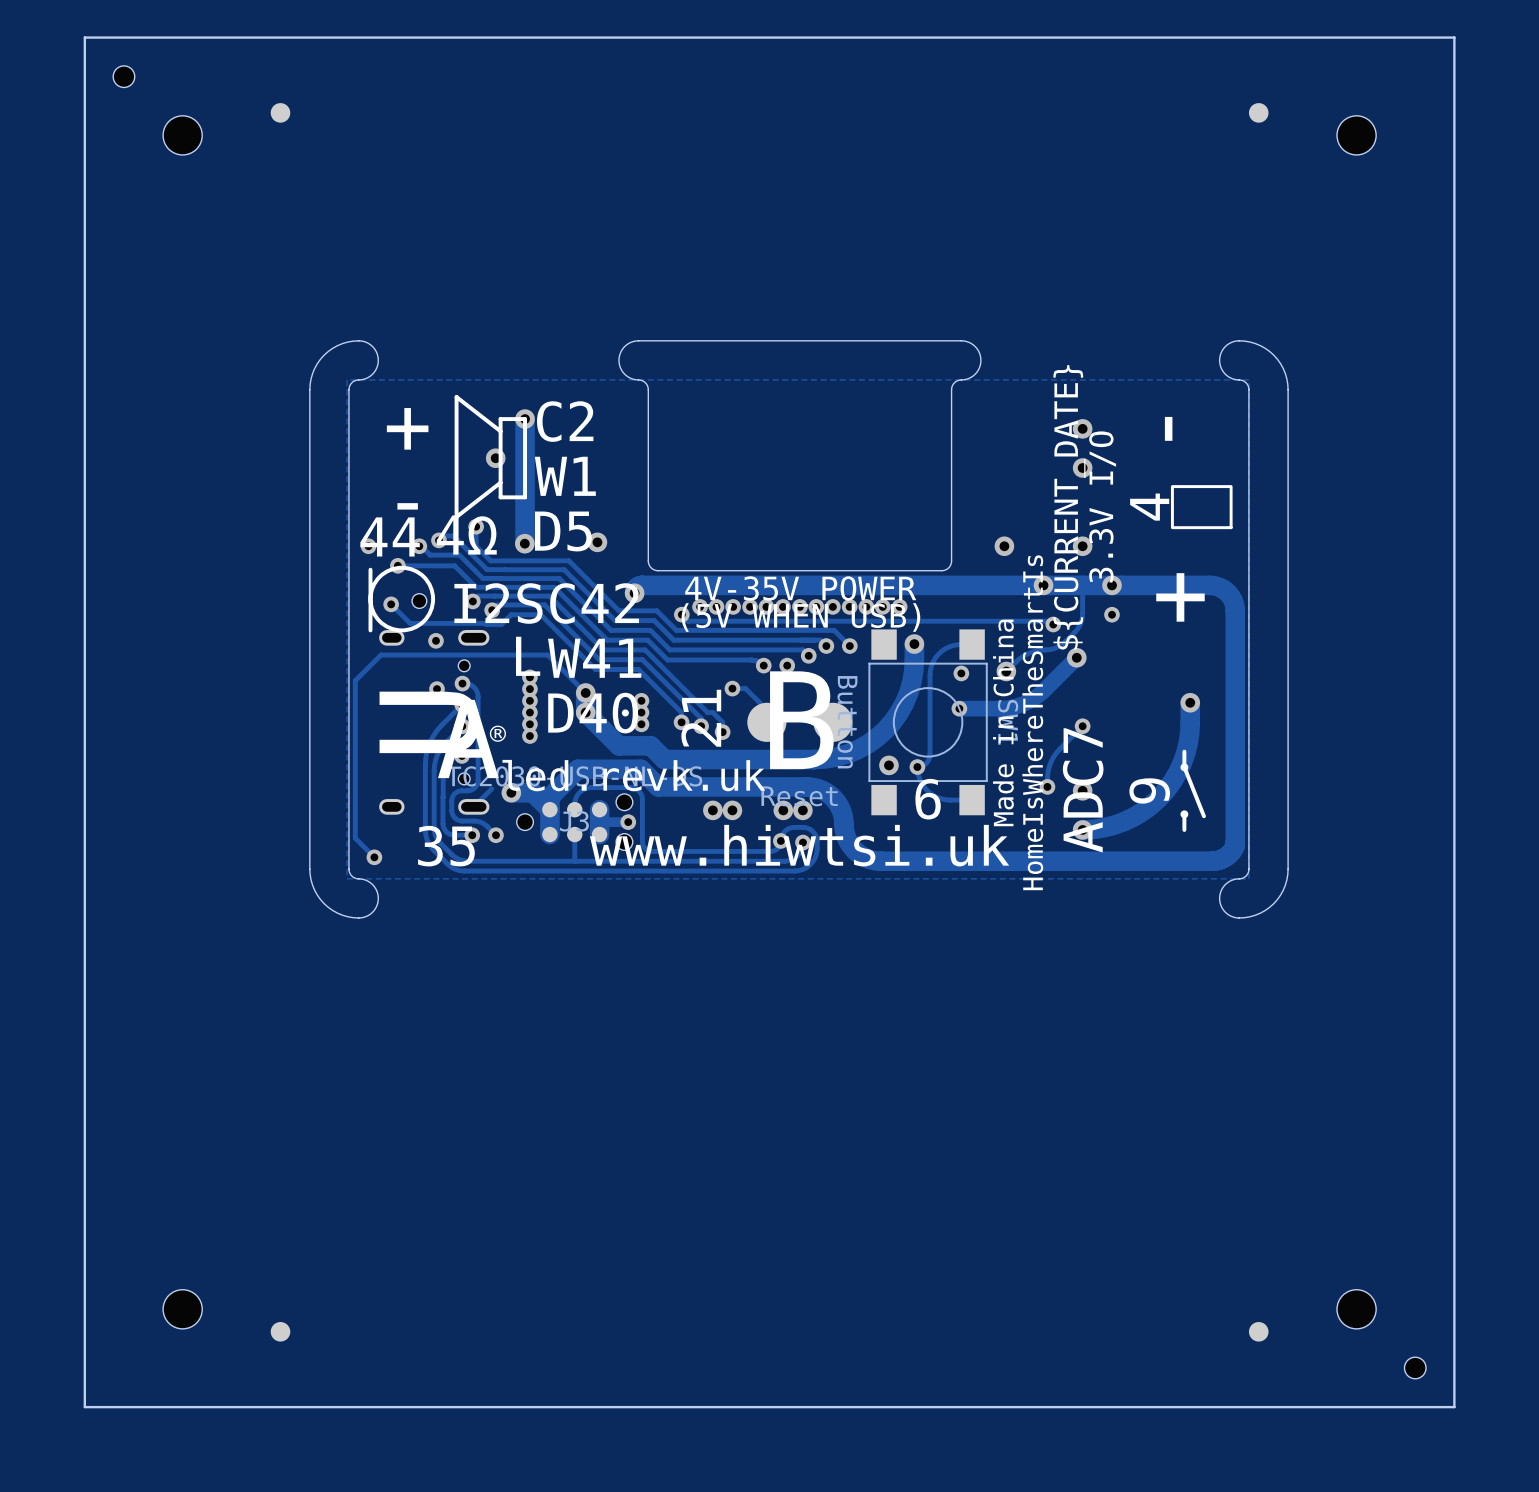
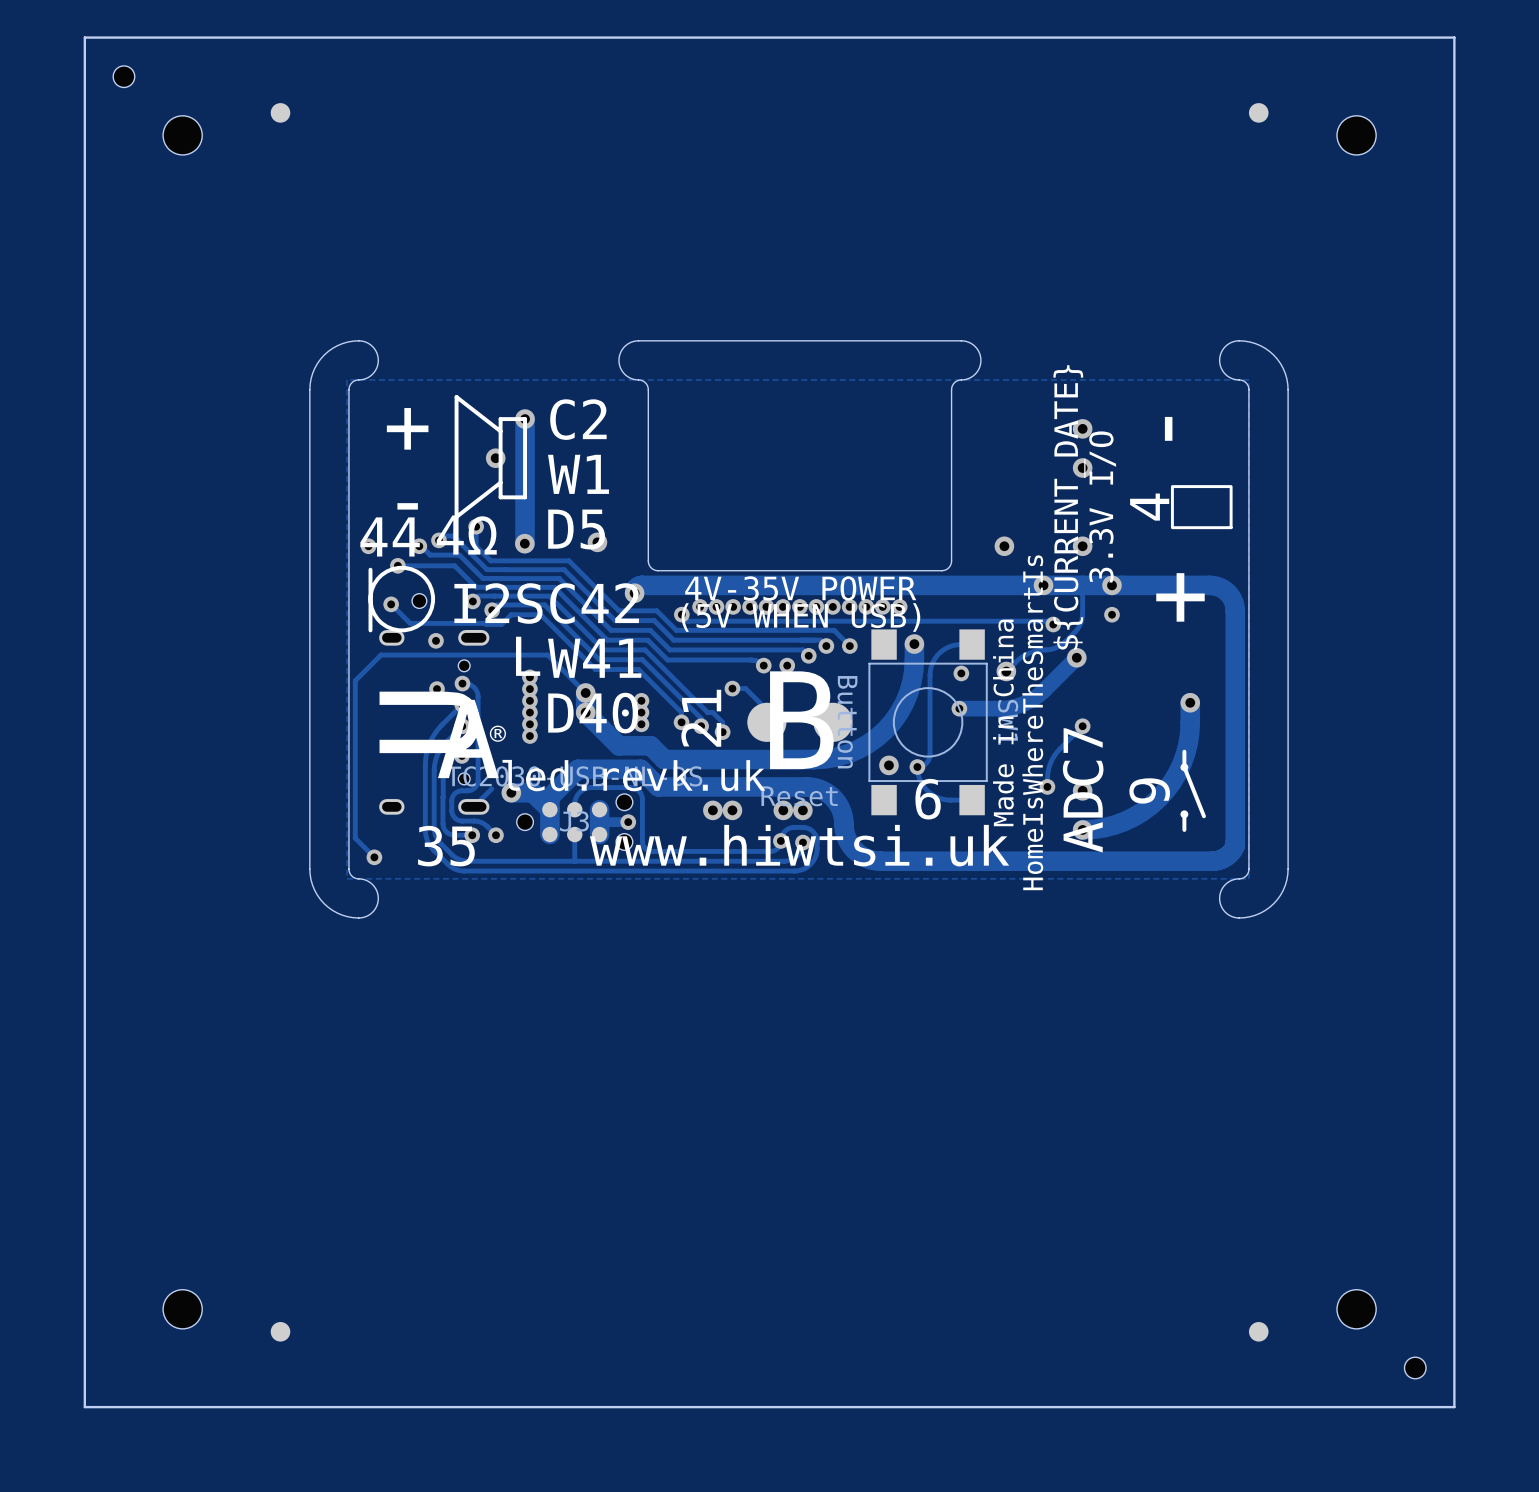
text position: C2 (565, 421) -> C2 (578, 419)
text position: W1 (565, 476) -> W1 (578, 474)
text position: D5 (563, 531) -> D5 (576, 529)

